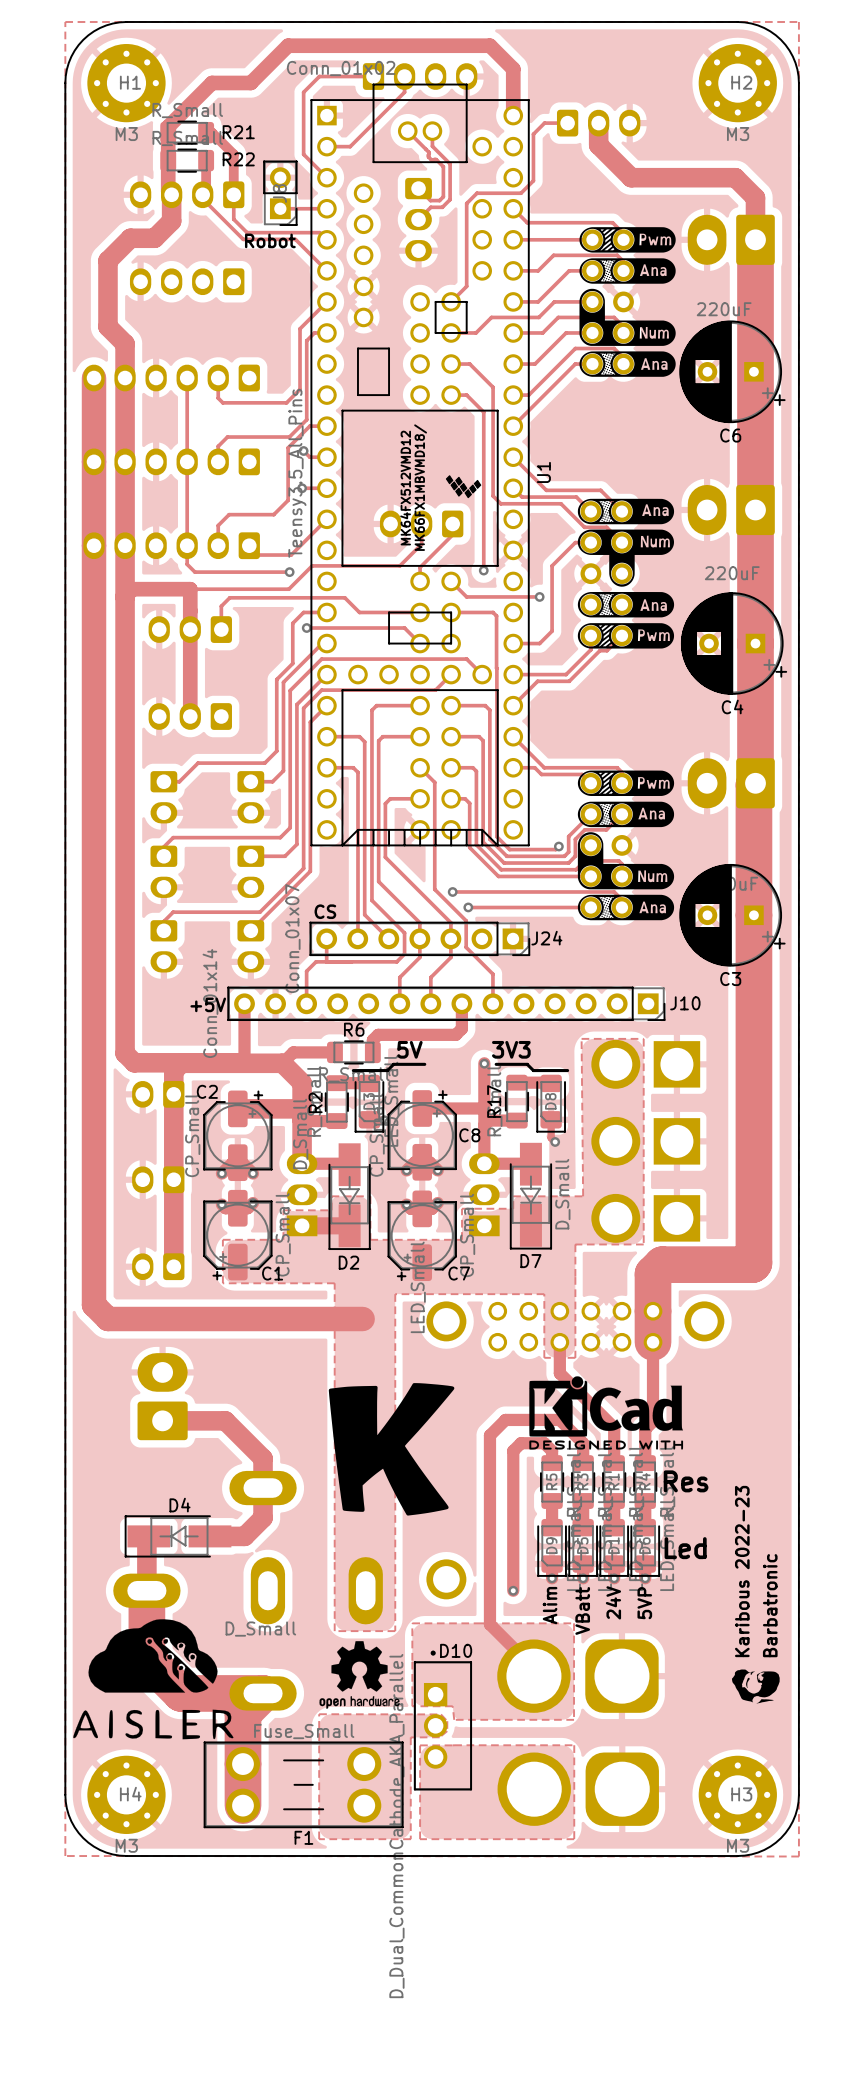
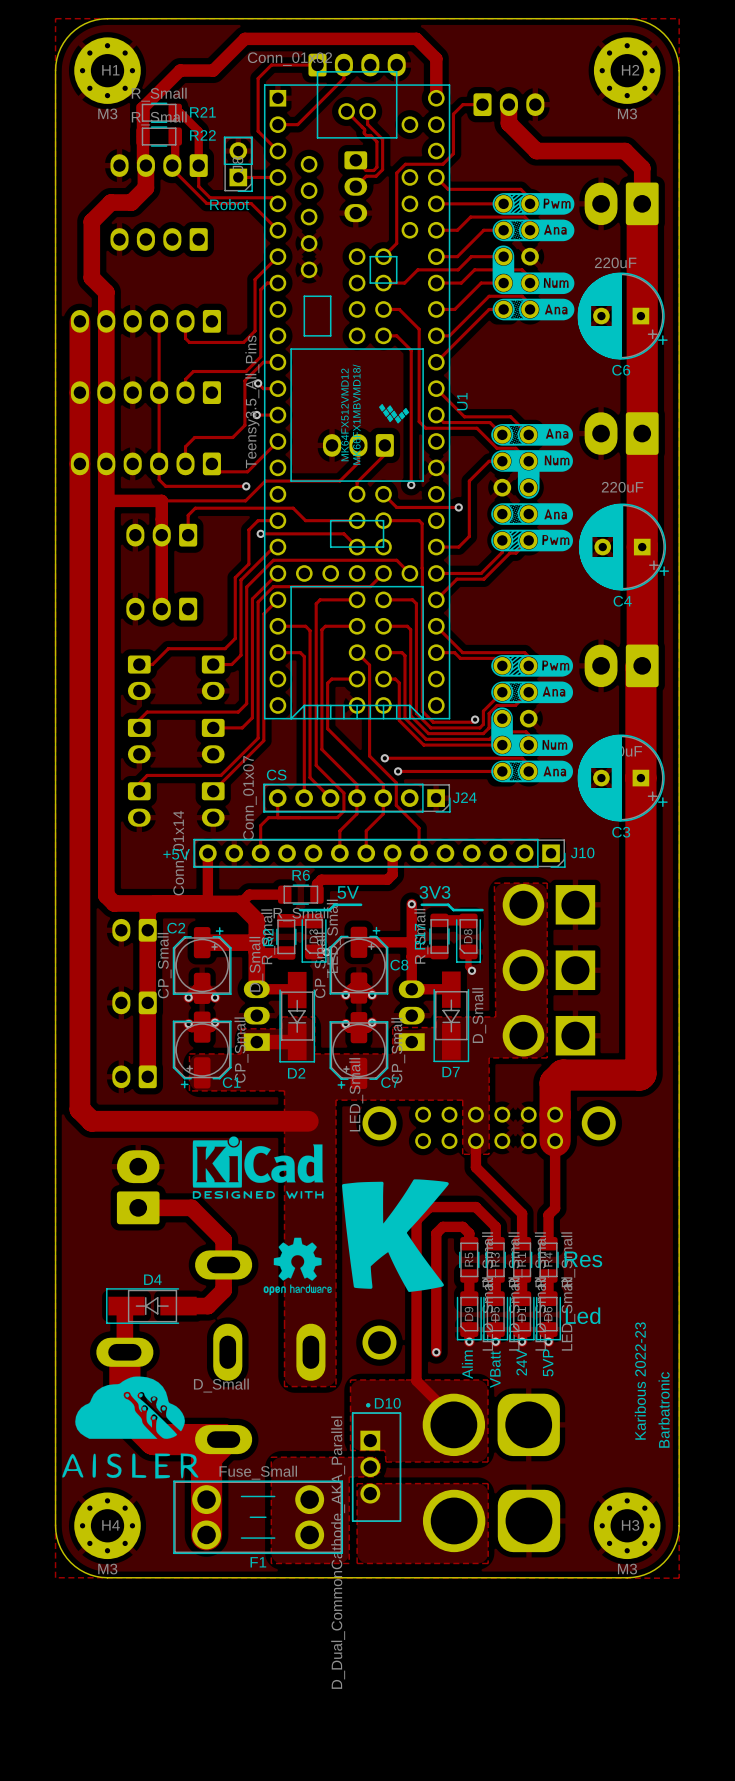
drawing position: (606, 1412) -> (258, 1167)
drawing position: (391, 1449) -> (395, 1235)
text position: Karibous 2022-23 (742, 1571) -> Karibous 2022-23 (640, 1381)
text position: Barbatronic (770, 1605) -> Barbatronic (664, 1409)
drawing: [732, 1669, 780, 1704] -> none
drawing position: (359, 1674) -> (297, 1266)

